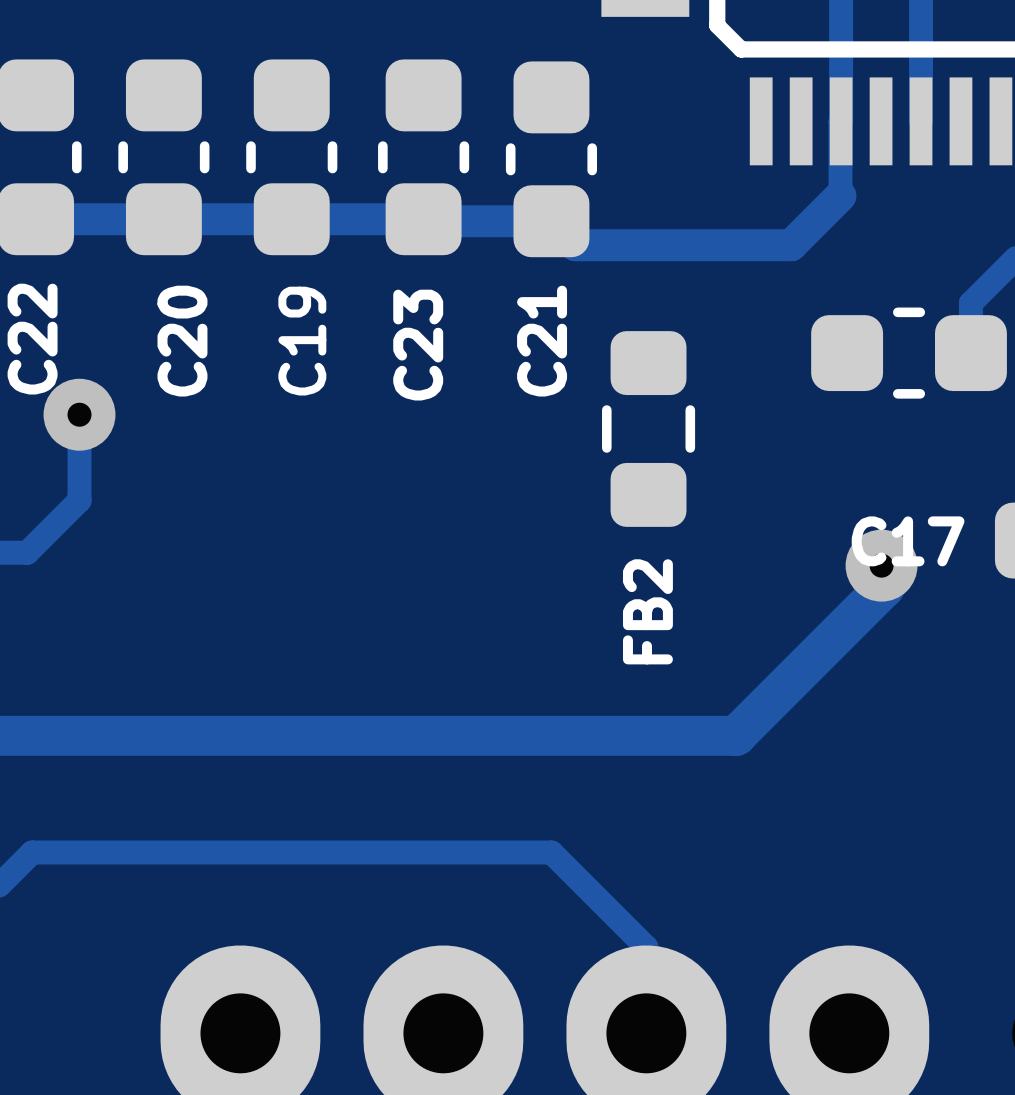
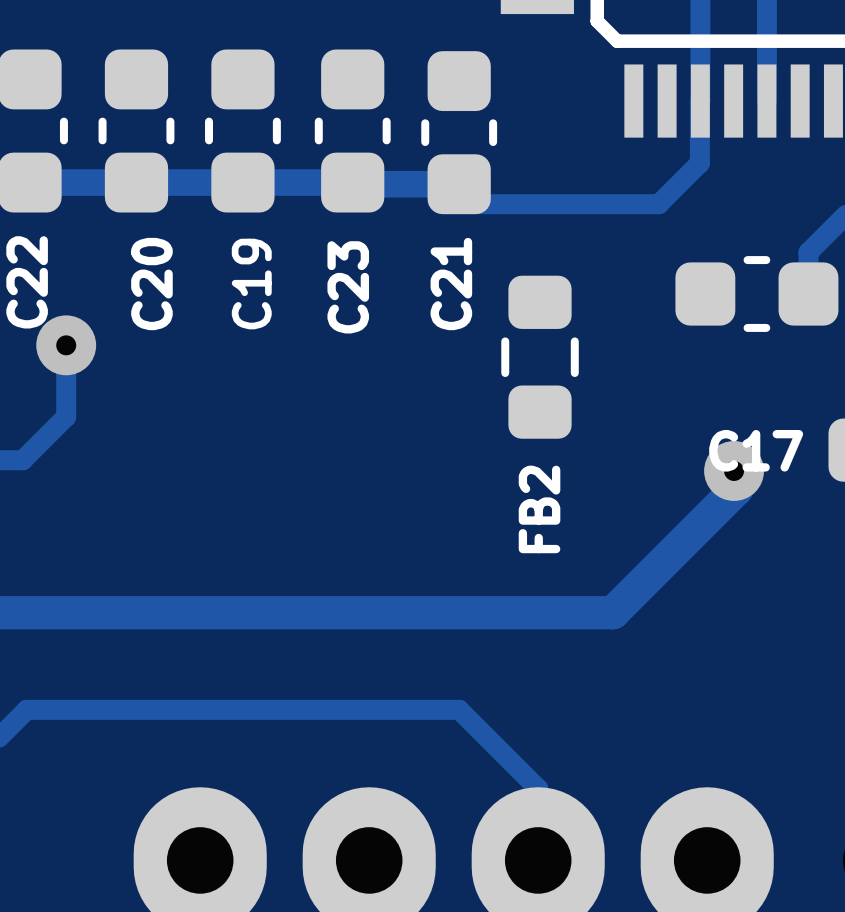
track width: thick (840, 195) (791, 245) (575, 245) (551, 221) -> thin (699, 163) (658, 204) (479, 204) (459, 184)

